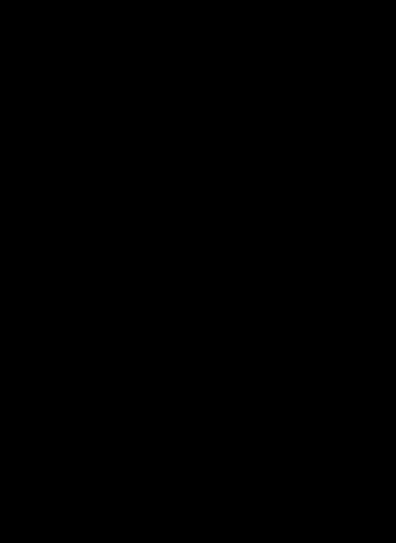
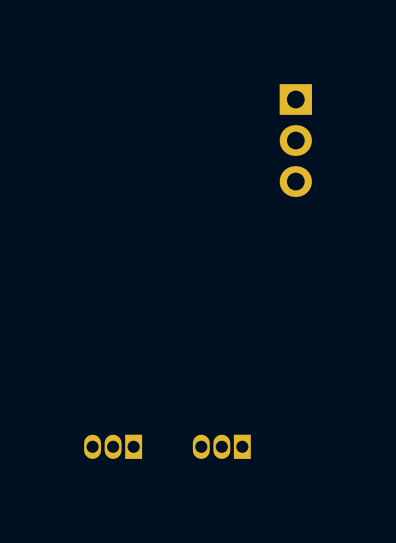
part: none -> (295, 140)
part: none -> (113, 446)
part: none -> (221, 446)

